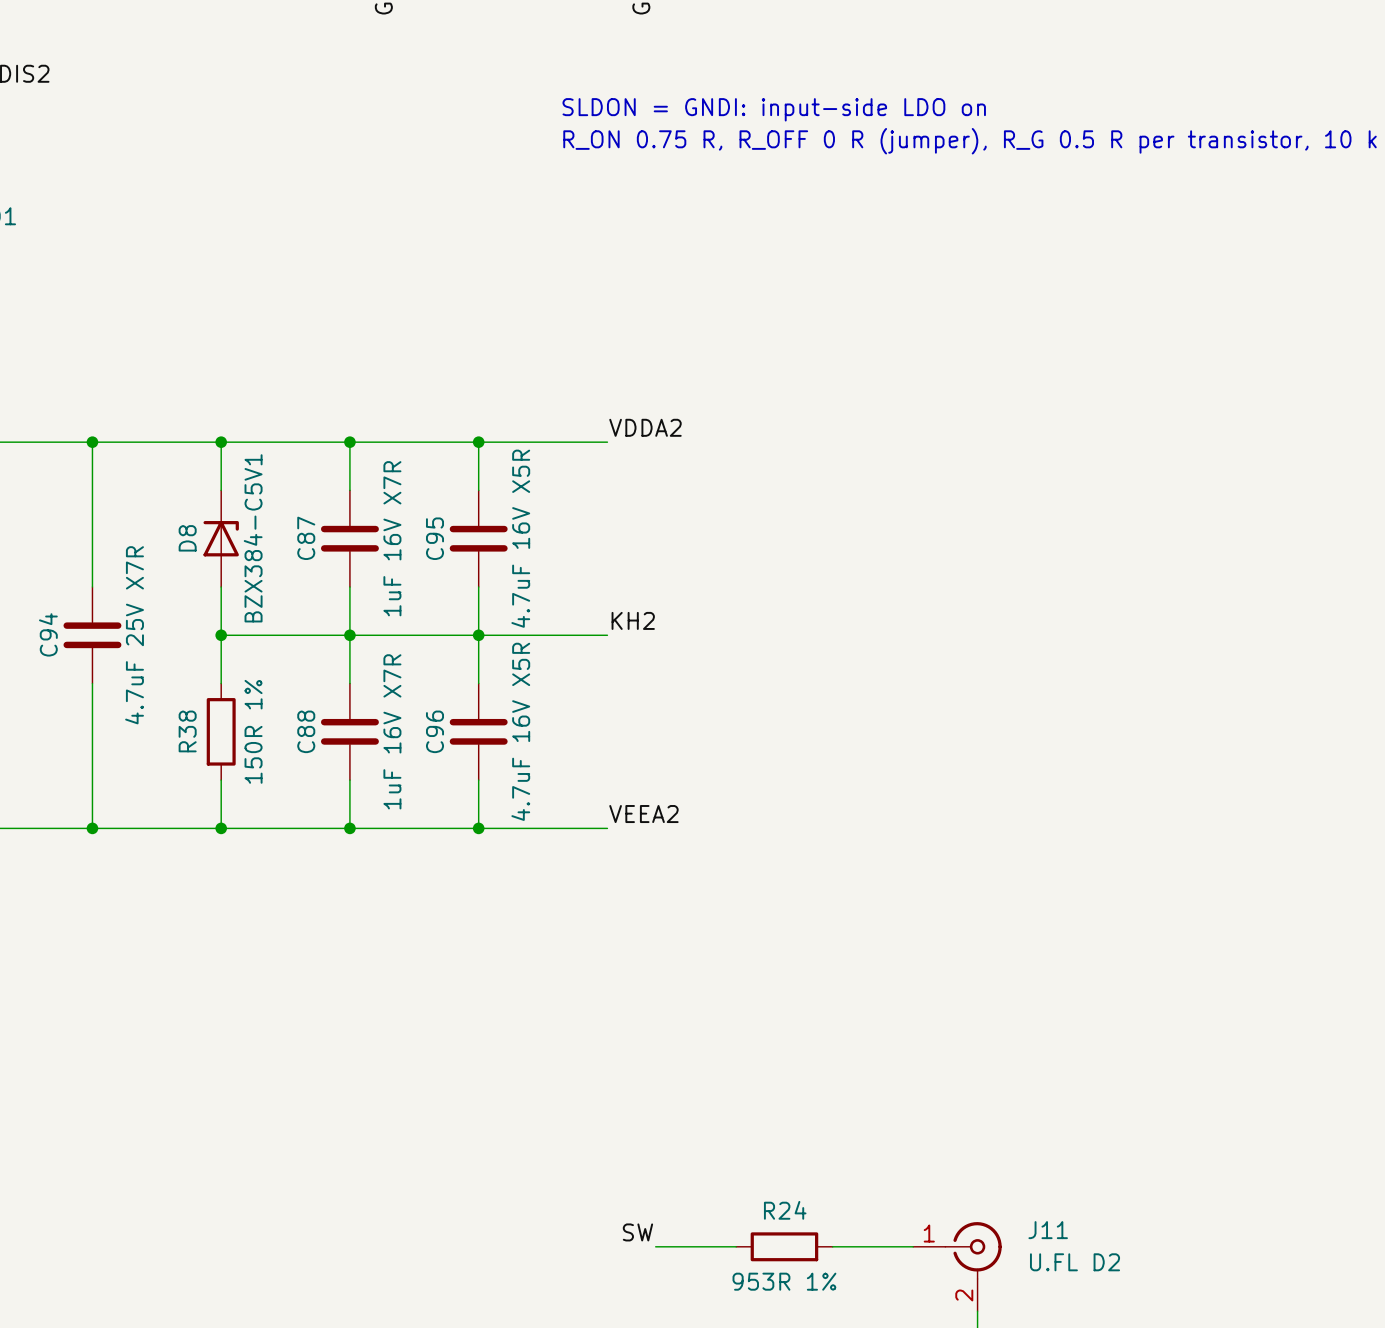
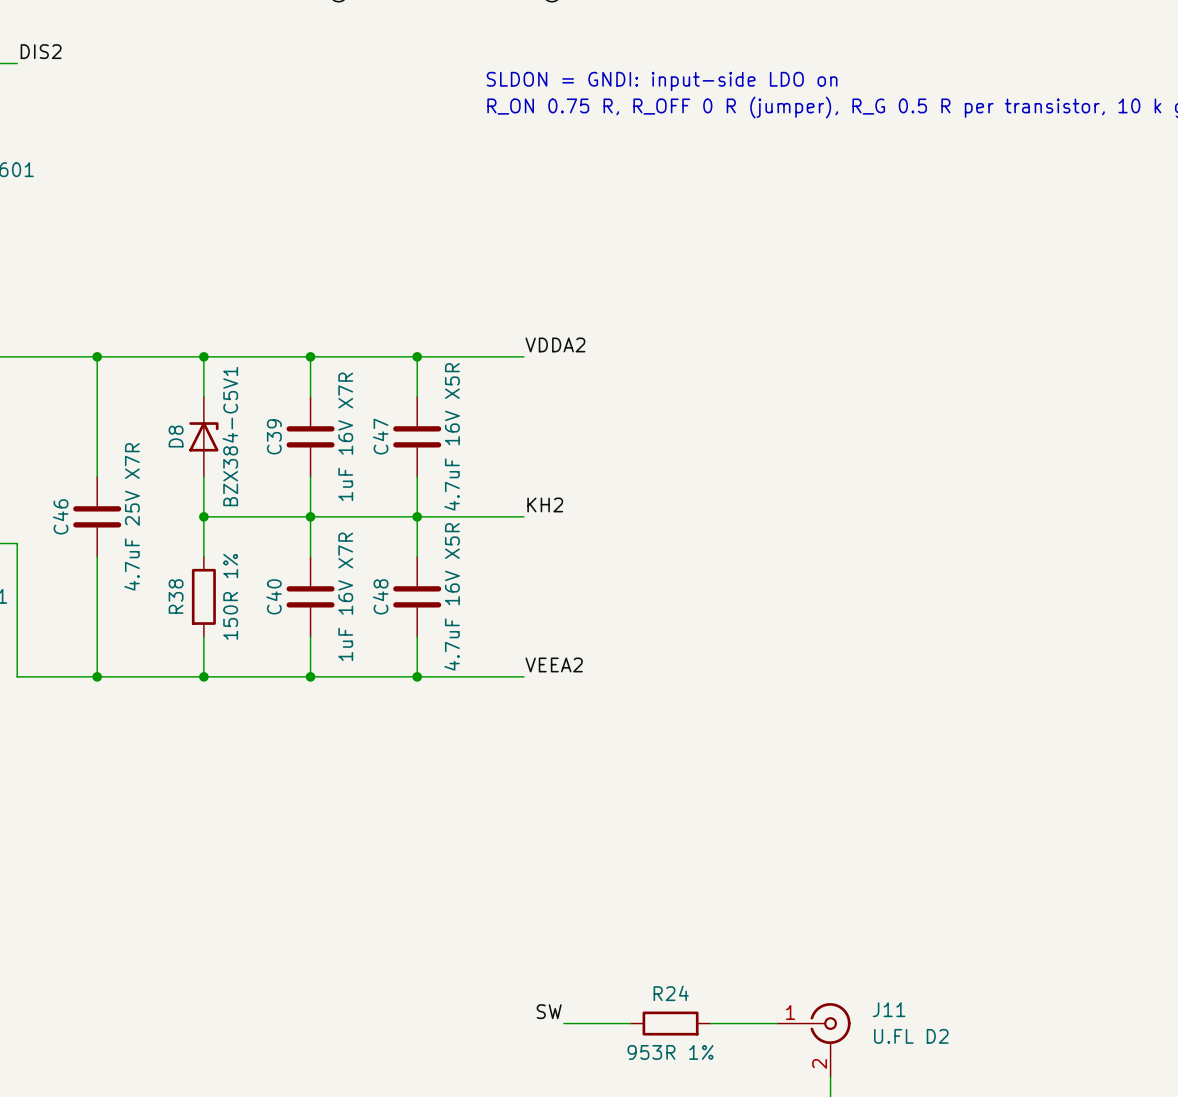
C87 name: C87 (306, 538) -> C39 (274, 436)
C95 name: C95 (435, 538) -> C47 (380, 436)
C94 name: C94 (48, 634) -> C46 (60, 516)
C88 name: C88 (306, 731) -> C40 (274, 596)
C96 name: C96 (435, 731) -> C48 (380, 596)

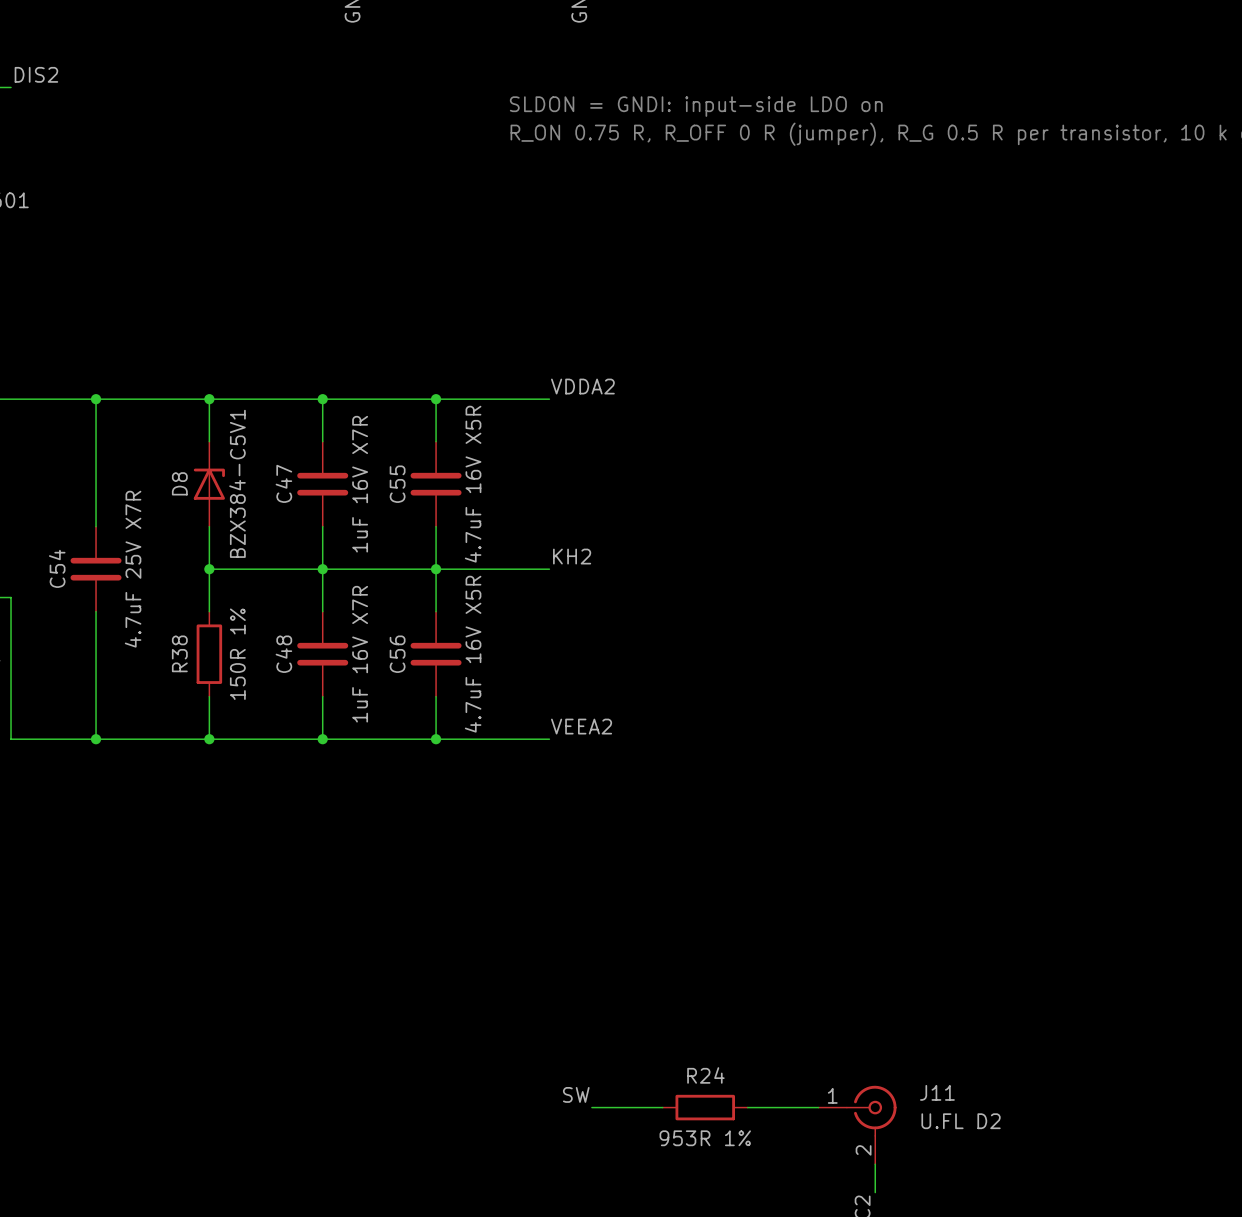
C39 name: C39 (274, 436) -> C47 (283, 483)
C47 name: C47 (380, 436) -> C55 (397, 484)
C46 name: C46 (60, 516) -> C54 (57, 568)
C40 name: C40 (274, 596) -> C48 (283, 654)
C48 name: C48 (380, 596) -> C56 (397, 654)

